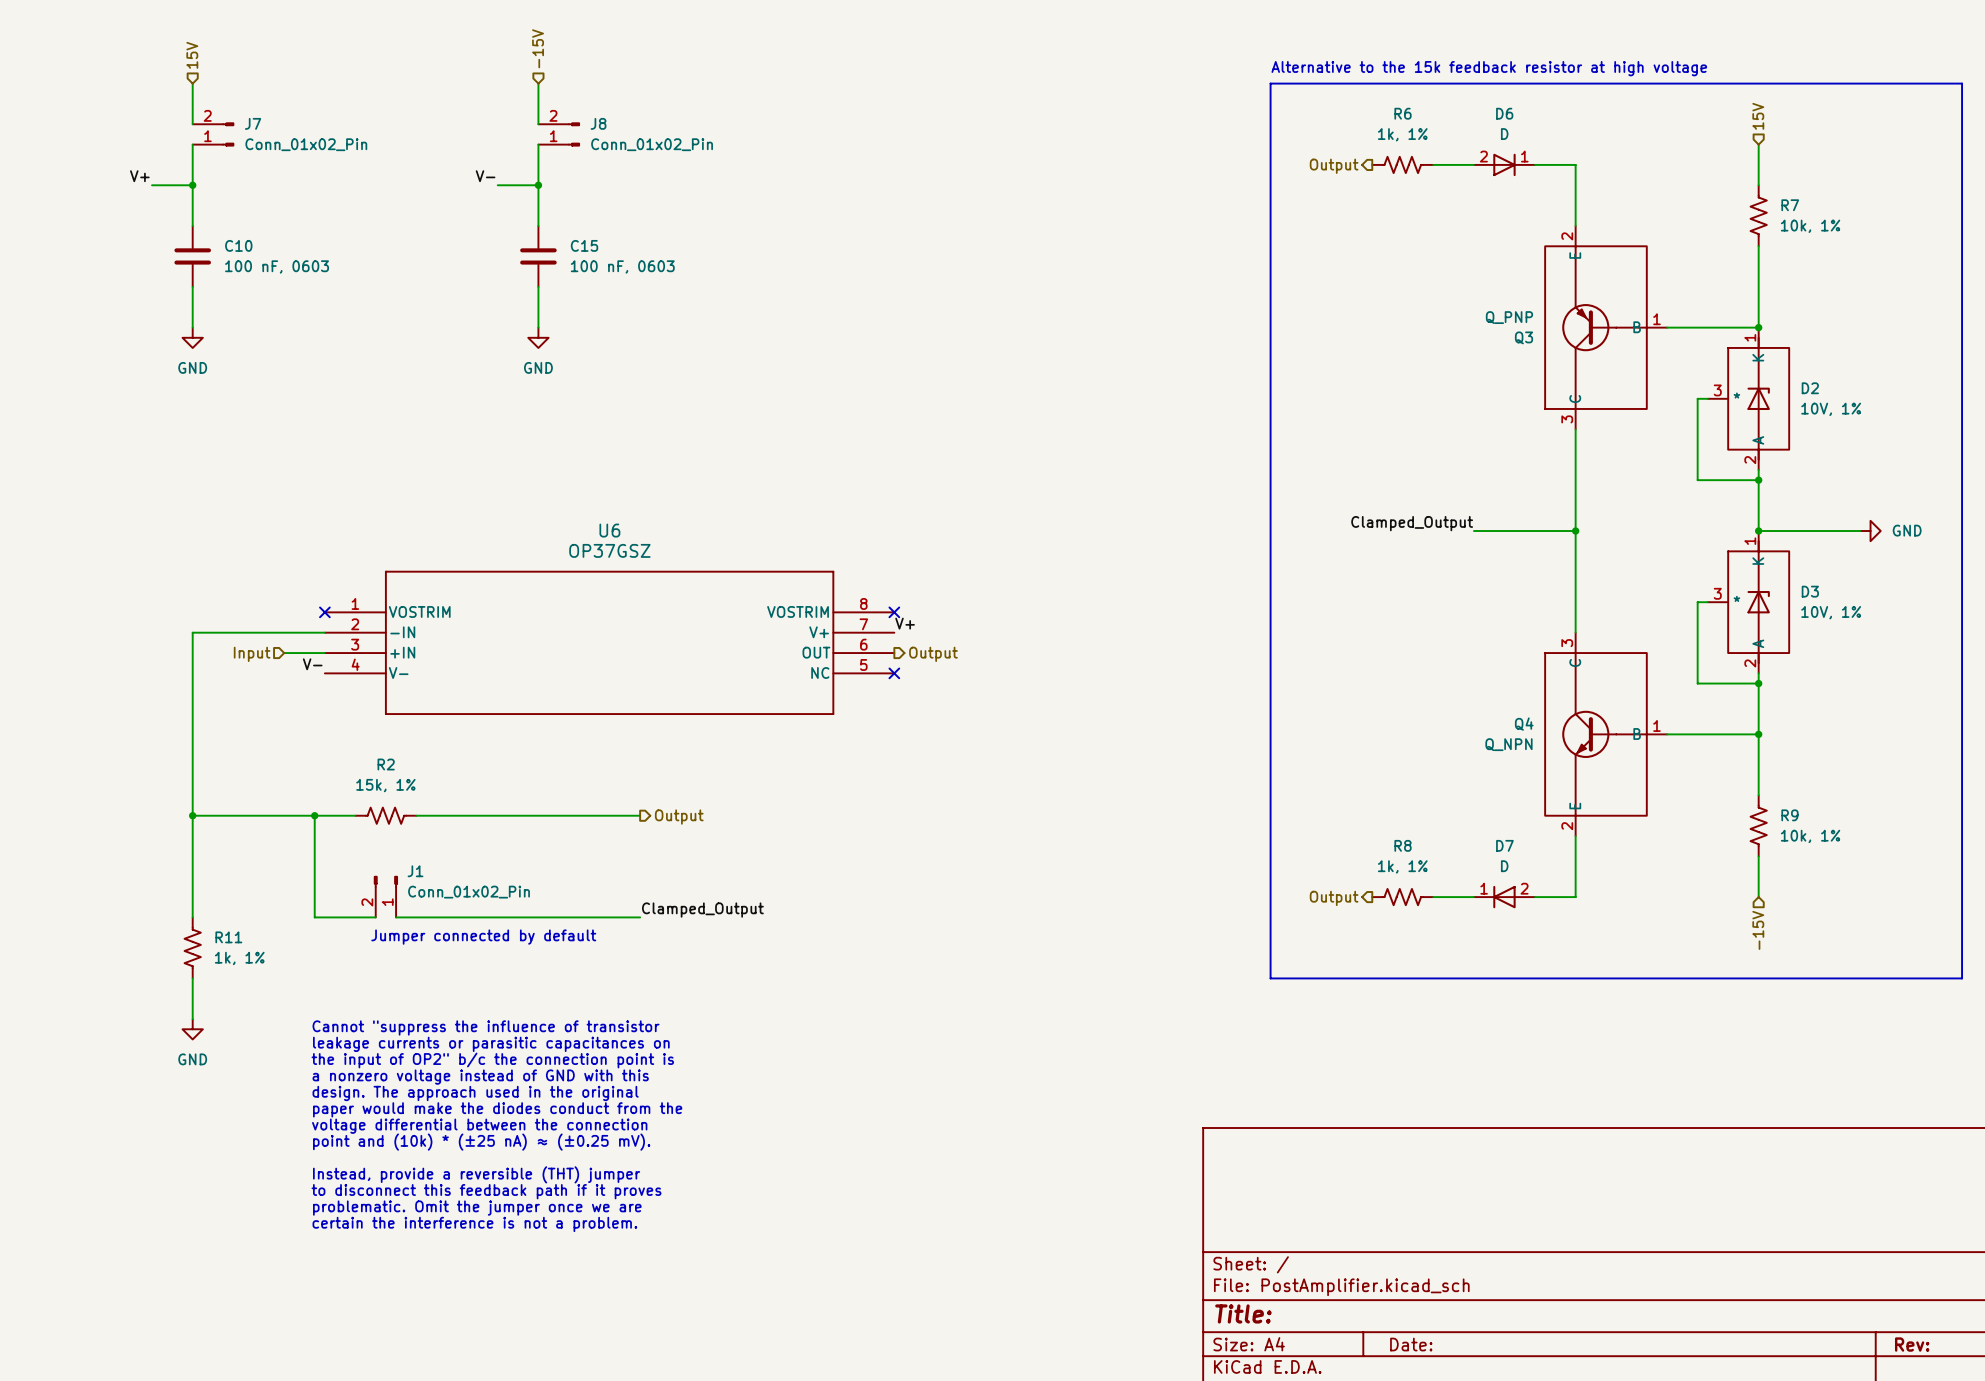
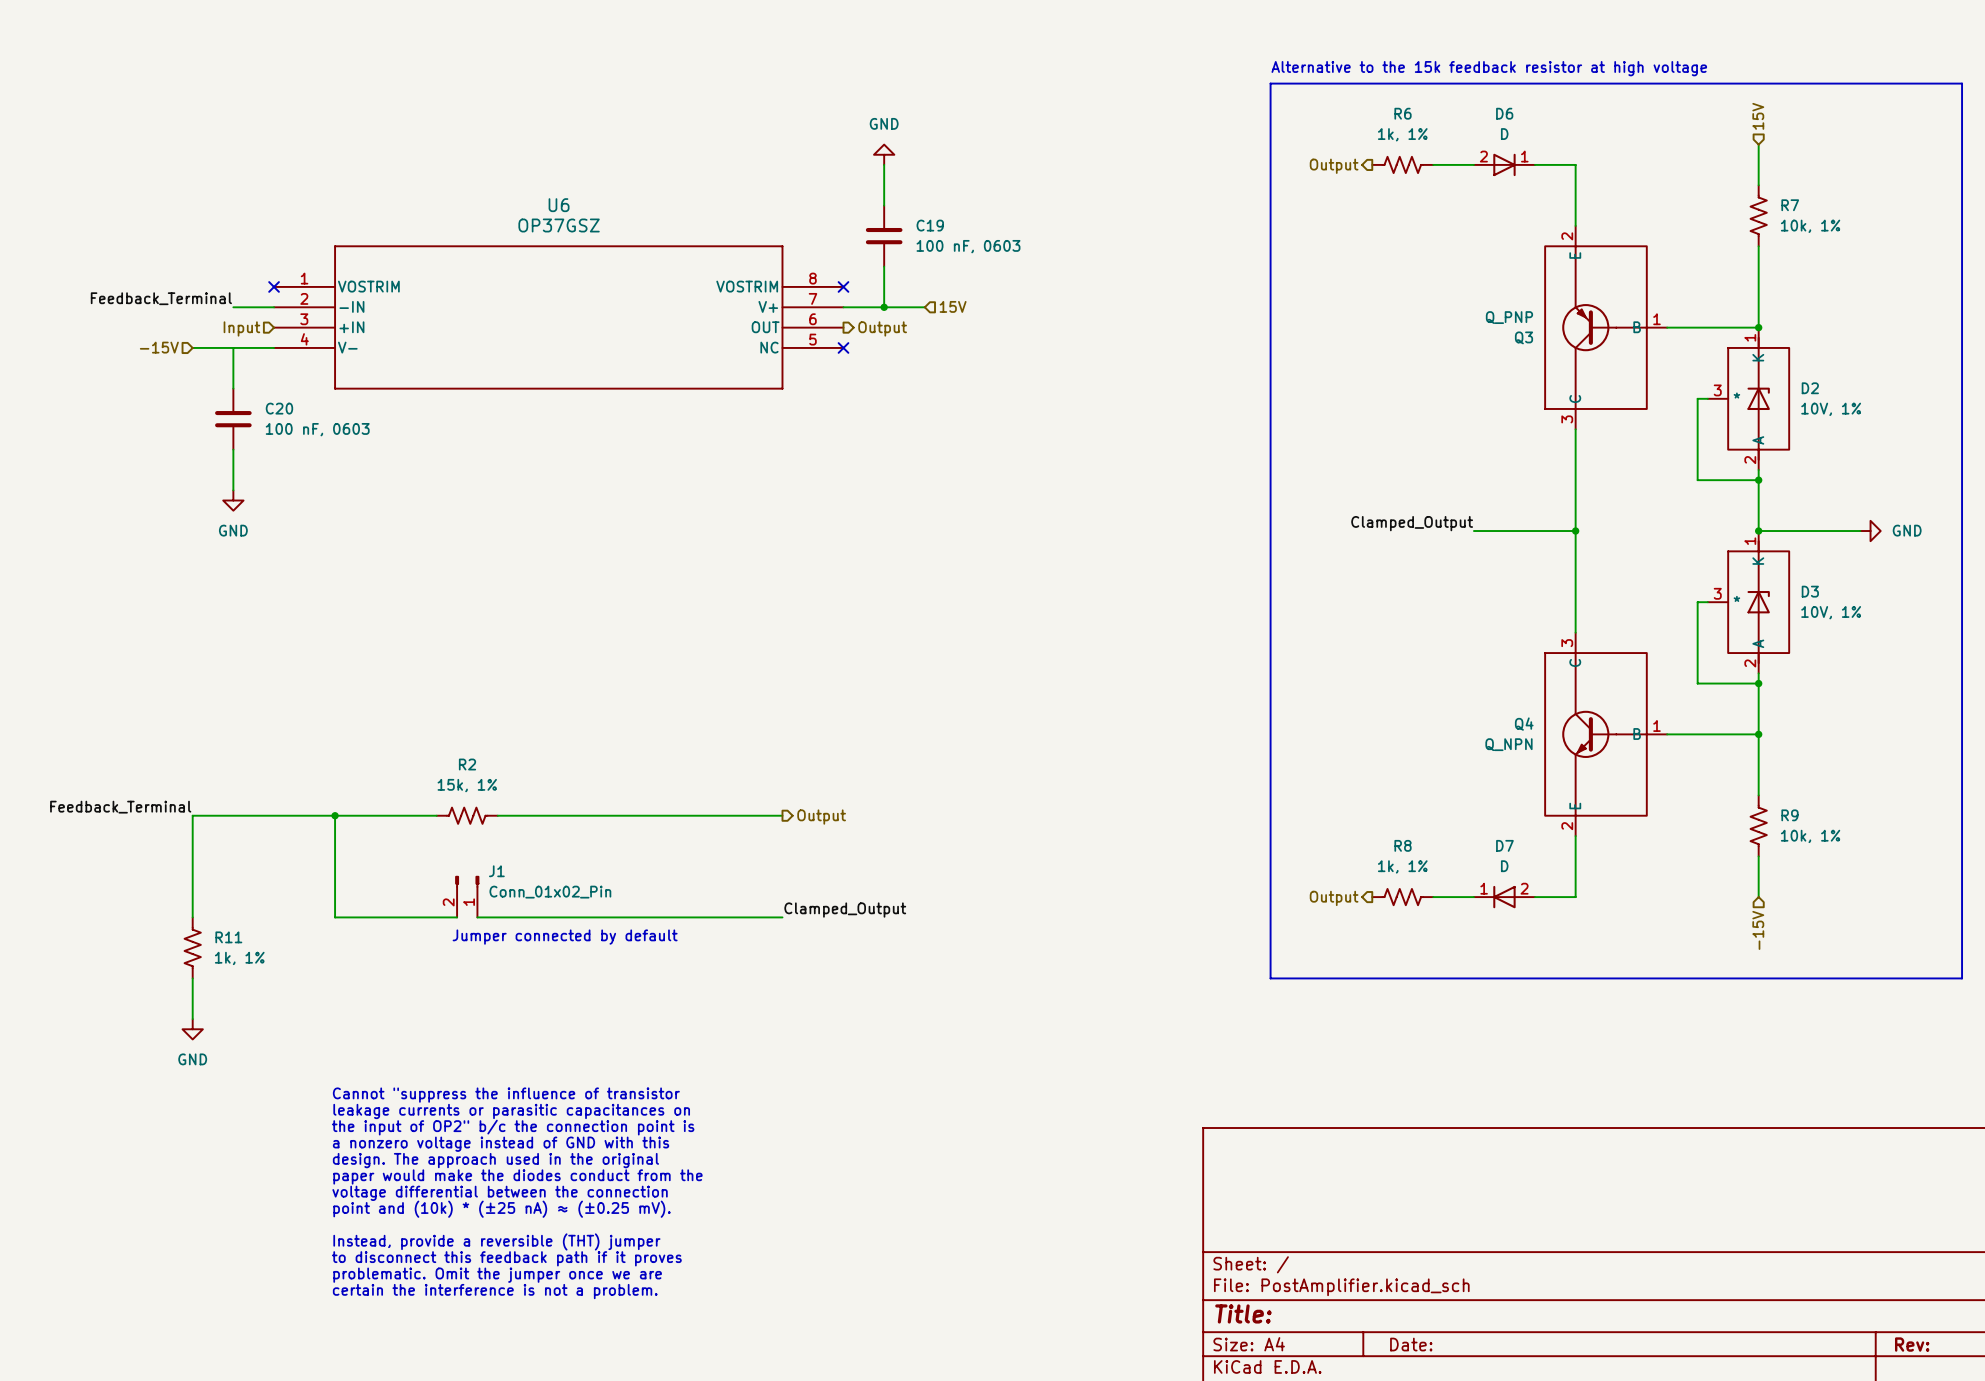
hierarchical label: -15V (538, 48) -> none
hierarchical label: 15V (192, 55) -> none
wire: (192, 83) (192, 124) -> none
wire: (538, 83) (538, 124) -> none
J7: Conn_01x02_Pin (213, 134) -> none
J8: Conn_01x02_Pin (559, 134) -> none
wire: (192, 144) (192, 225) -> none
wire: (538, 144) (538, 225) -> none
power symbol: none -> GND (884, 154)
wire: none -> (884, 164) (884, 205)
label: V+ (139, 176) -> none
label: V- (485, 176) -> none
wire: (152, 185) (192, 185) -> (233, 307) (274, 307)
junction: (192, 185) -> none
wire: (497, 185) (538, 185) -> none
junction: (538, 185) -> none
C19: none -> 100 nF, 0603 (884, 236)
C10: 100 nF, 0603 (192, 256) -> none
C15: 100 nF, 0603 (538, 256) -> none
wire: none -> (884, 266) (884, 307)
wire: (192, 286) (192, 327) -> (233, 347) (233, 388)
no-connect mark: none -> (274, 286)
wire: (538, 286) (538, 327) -> none
no-connect mark: none -> (843, 286)
label: none -> Feedback_Terminal (161, 298)
hierarchical label: none -> 15V (953, 306)
wire: none -> (843, 307) (924, 307)
junction: none -> (884, 307)
hierarchical label: none -> Input (241, 328)
hierarchical label: none -> Output (882, 328)
power symbol position: GND (192, 337) -> GND (233, 500)
power symbol: GND (538, 337) -> none
hierarchical label: none -> -15V (159, 347)
wire: none -> (192, 347) (274, 347)
no-connect mark: none -> (843, 347)
C20: none -> 100 nF, 0603 (233, 419)
wire: none -> (233, 449) (233, 490)
no-connect mark: (324, 612) -> none
no-connect mark: (894, 612) -> none
label: V+ (905, 623) -> none
wire: (324, 632) (192, 632) (192, 815) -> none
U6 position: (609, 642) -> (558, 317)
wire: (284, 653) (324, 653) -> none
hierarchical label: Input (252, 654) -> none
hierarchical label: Output (933, 654) -> none
label: V- (312, 664) -> none
no-connect mark: (894, 673) -> none
label: none -> Feedback_Terminal (120, 807)
junction: (192, 815) -> none
wire: (314, 815) (314, 917) (335, 917) -> (335, 815) (335, 917)
junction position: (314, 815) -> (335, 815)
R2 position: (385, 815) -> (467, 815)
wire: none -> (640, 815) (782, 815)
hierarchical label: Output (679, 817) -> none
hierarchical label: none -> Output (821, 817)
J1 position: (385, 896) -> (467, 896)
label position: Clamped_Output (702, 910) -> Clamped_Output (845, 910)
wire: (457, 917) (477, 917) -> (375, 917) (396, 917)
wire: none -> (640, 917) (782, 917)
text position: Jumper connected by default (483, 937) -> Jumper connected by default (565, 937)
text position: Cannot "suppress the influence of transistor (486, 1027) -> Cannot "suppress the influence of transistor (506, 1095)
text position: leakage currents or parasitic capacitances on (491, 1044) -> leakage currents or parasitic capacitances on (511, 1111)
text position: the input of OP2" b/c the connection point is (492, 1060) -> the input of OP2" b/c the connection point is (513, 1127)
text position: a nonzero voltage instead of GND with this (480, 1077) -> a nonzero voltage instead of GND with this (501, 1144)
text position: design. The approach used in the original (475, 1093) -> design. The approach used in the original (495, 1160)
text position: paper would make the diodes conduct from the (497, 1109) -> paper would make the diodes conduct from the (517, 1176)
text position: voltage differential between the connection (479, 1126) -> voltage differential between the connection (500, 1193)
text position: point and (10k) * (±25 nA) ≈ (±0.25 mV). (481, 1142) -> point and (10k) * (±25 nA) ≈ (±0.25 mV). (502, 1209)
text position: Instead, provide a reversible (THT) jumper (476, 1174) -> Instead, provide a reversible (THT) jumper (496, 1241)
text position: to disconnect this feedback path if it proves (486, 1191) -> to disconnect this feedback path if it proves (506, 1258)
text position: problematic. Omit the jumper once we are (477, 1208) -> problematic. Omit the jumper once we are (497, 1275)
text position: certain the interference is not a problem. (474, 1224) -> certain the interference is not a problem. (495, 1291)

